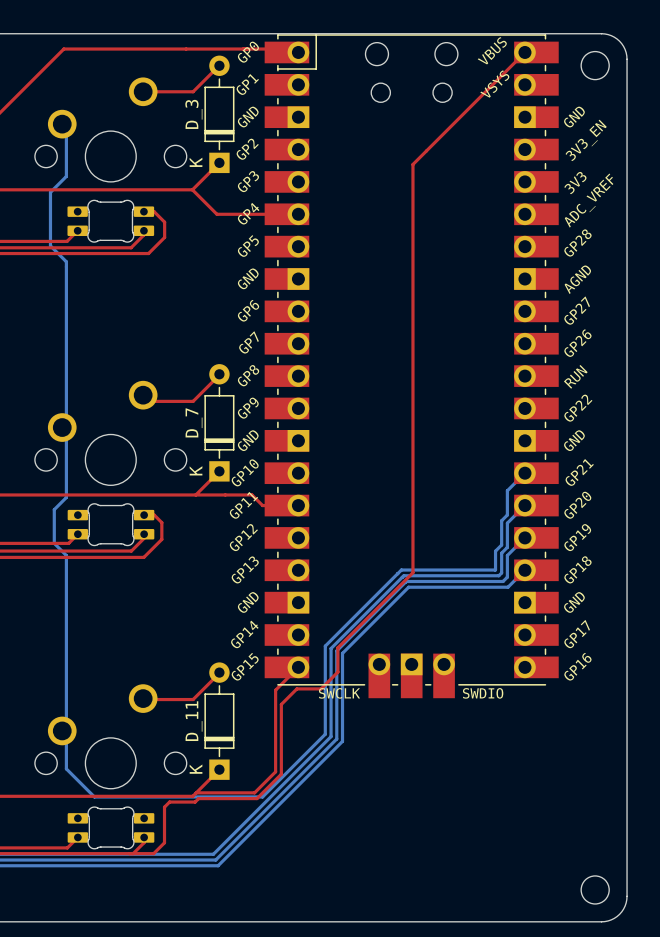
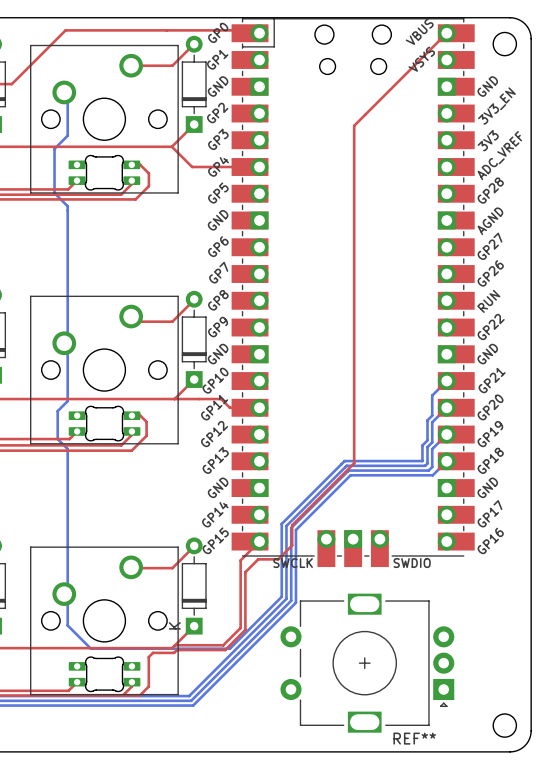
line: none -> (30, 45) (30, 192) (178, 192) (178, 45) (30, 45)
D_3 name: D_3 (193, 114) -> none
D_3 text: K (196, 162) -> none
line: none -> (30, 296) (30, 443) (178, 443) (178, 296) (30, 296)
D_7 name: D_7 (194, 422) -> none
D_7 text: K (196, 470) -> none
line: none -> (30, 547) (30, 694) (178, 694) (178, 547) (30, 547)
D_11 name: D_11 (194, 721) -> none
REF**: none -> (367, 663)

